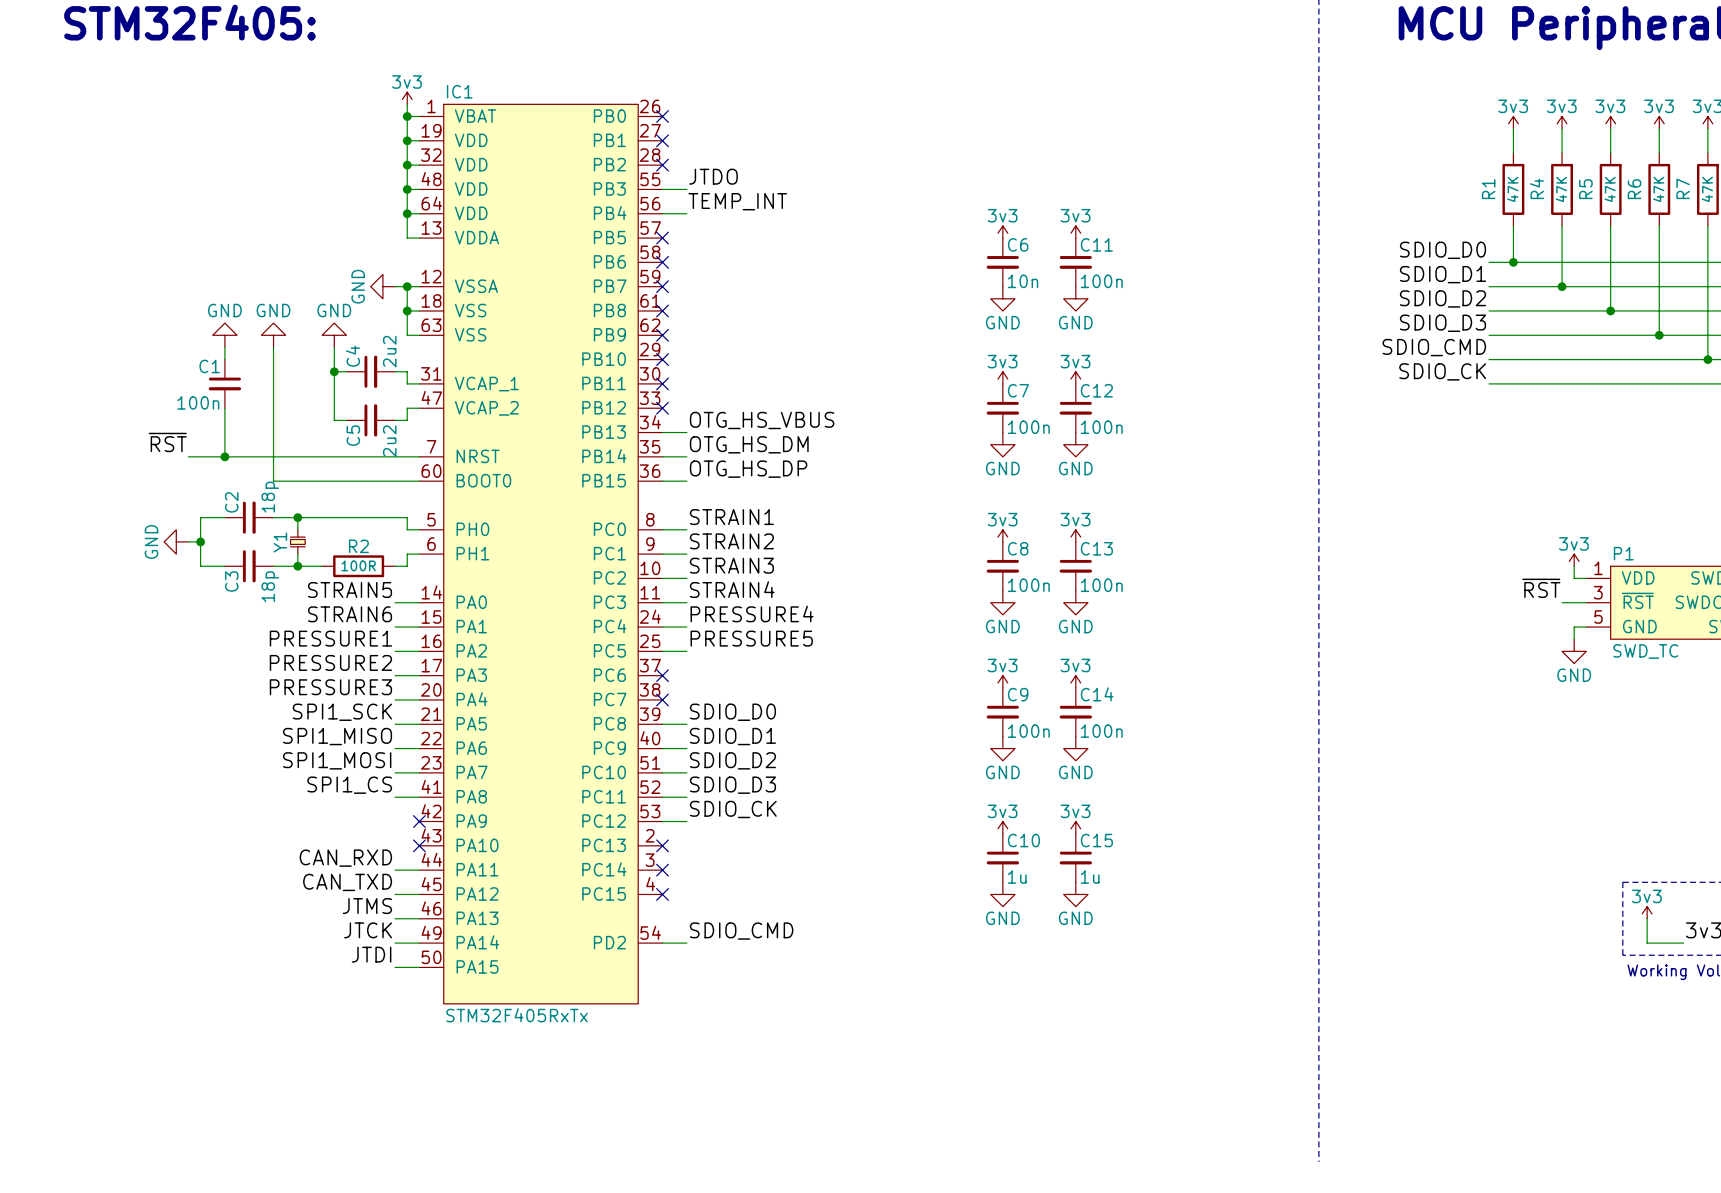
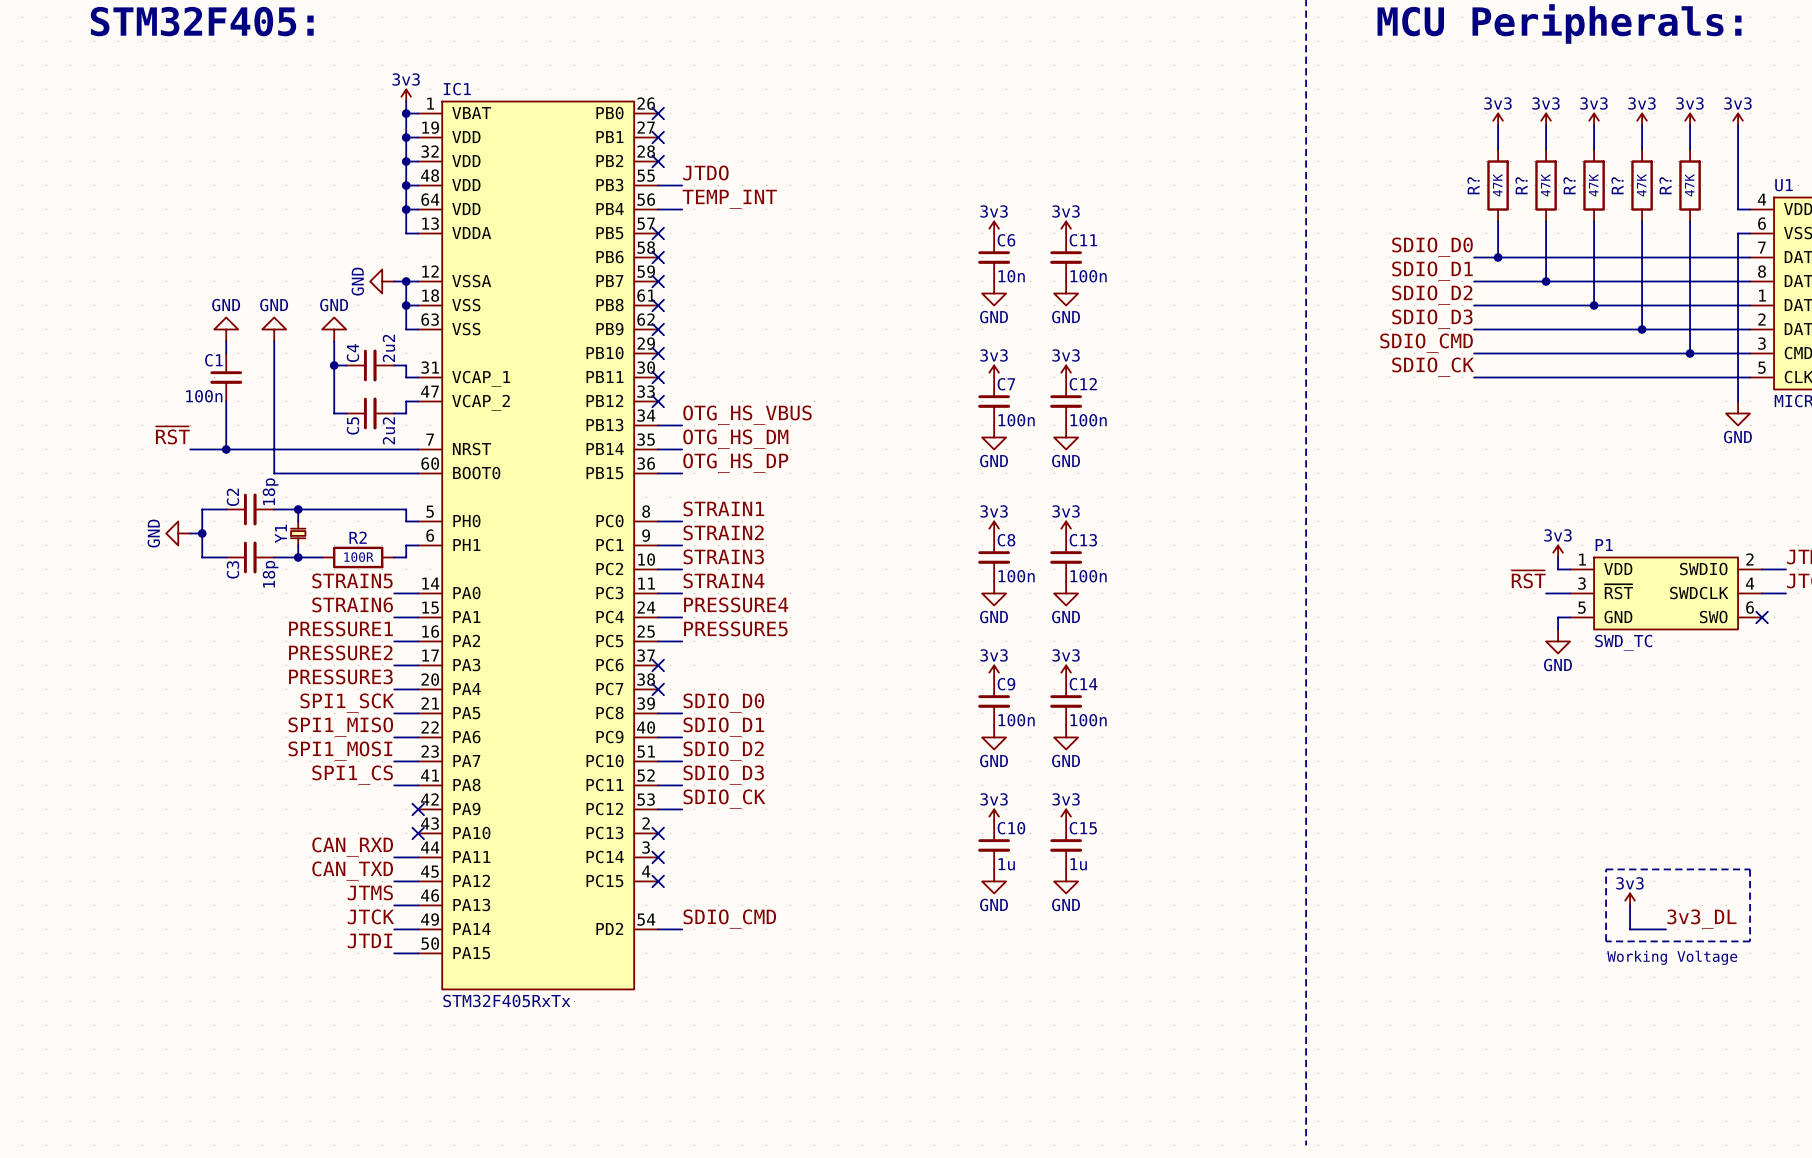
R4 name: R4 (1536, 188) -> R? (1521, 185)
R7 name: R7 (1683, 188) -> R? (1665, 185)
R1 name: R1 (1488, 189) -> R? (1473, 185)
R5 name: R5 (1585, 189) -> R? (1569, 185)
R6 name: R6 (1634, 189) -> R? (1617, 185)

